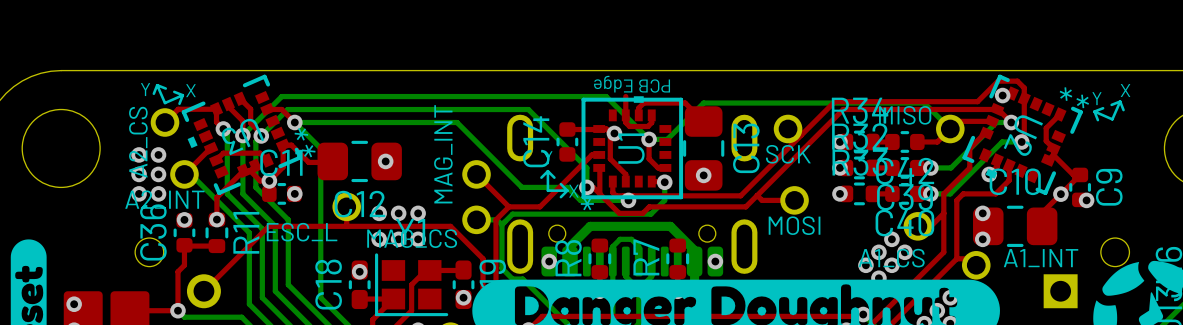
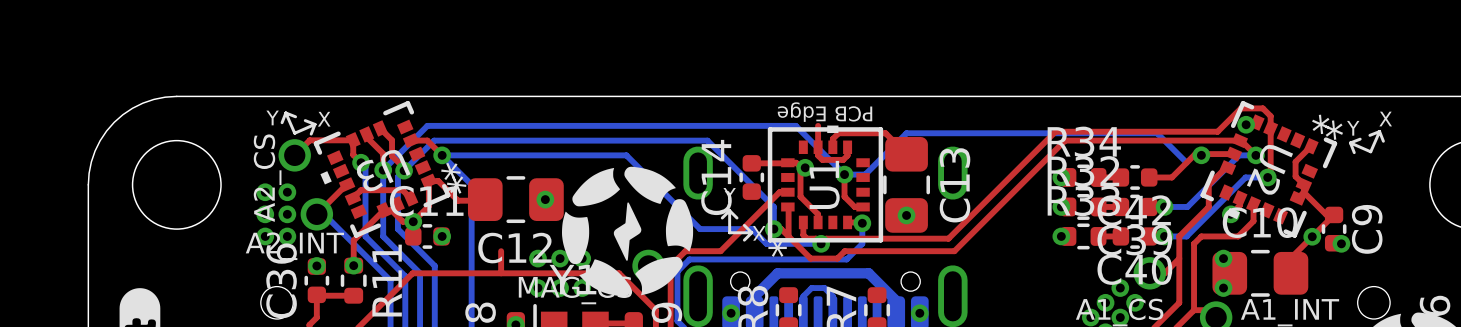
via: none -> (1201, 155)
part: SCK (788, 128) -> none
part: MISO (950, 128) -> none
drawing: none -> [562, 166, 694, 297]
top track: (476, 174) (508, 206) -> none
part: MAG_INT (476, 174) -> none
top track: (757, 195) (762, 200) (788, 200) -> none
part: MOSI (794, 200) -> none
part: ESC_L (346, 206) -> none

